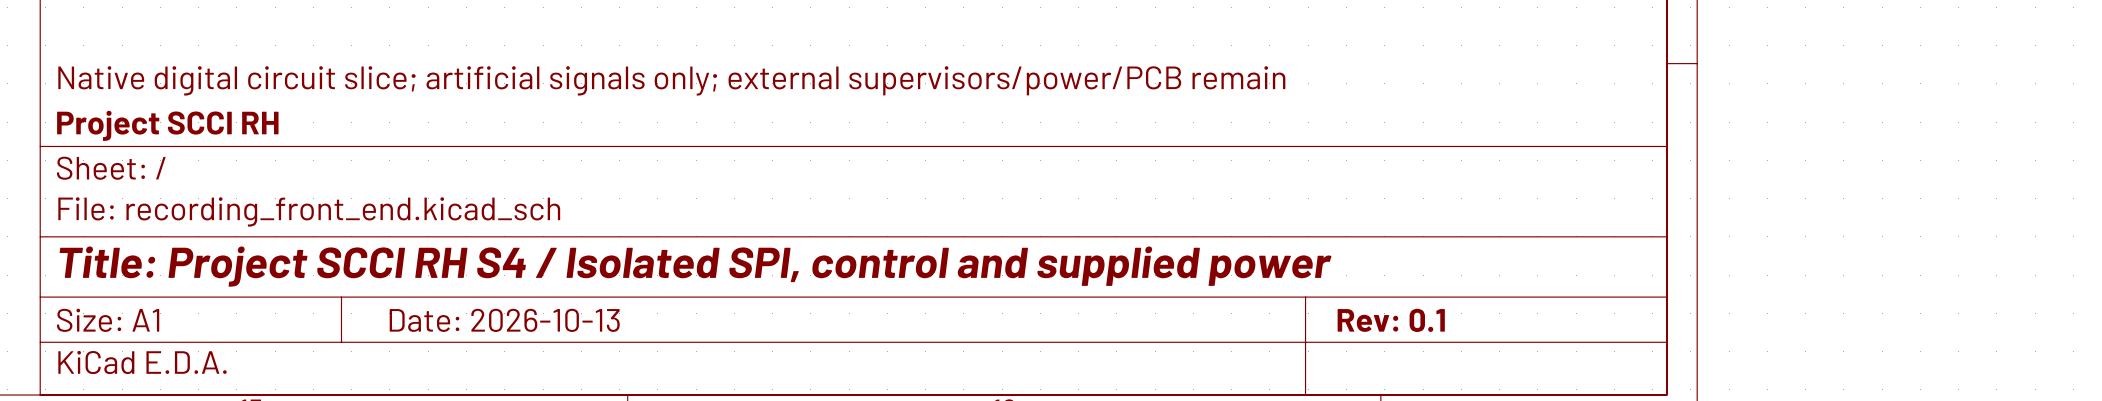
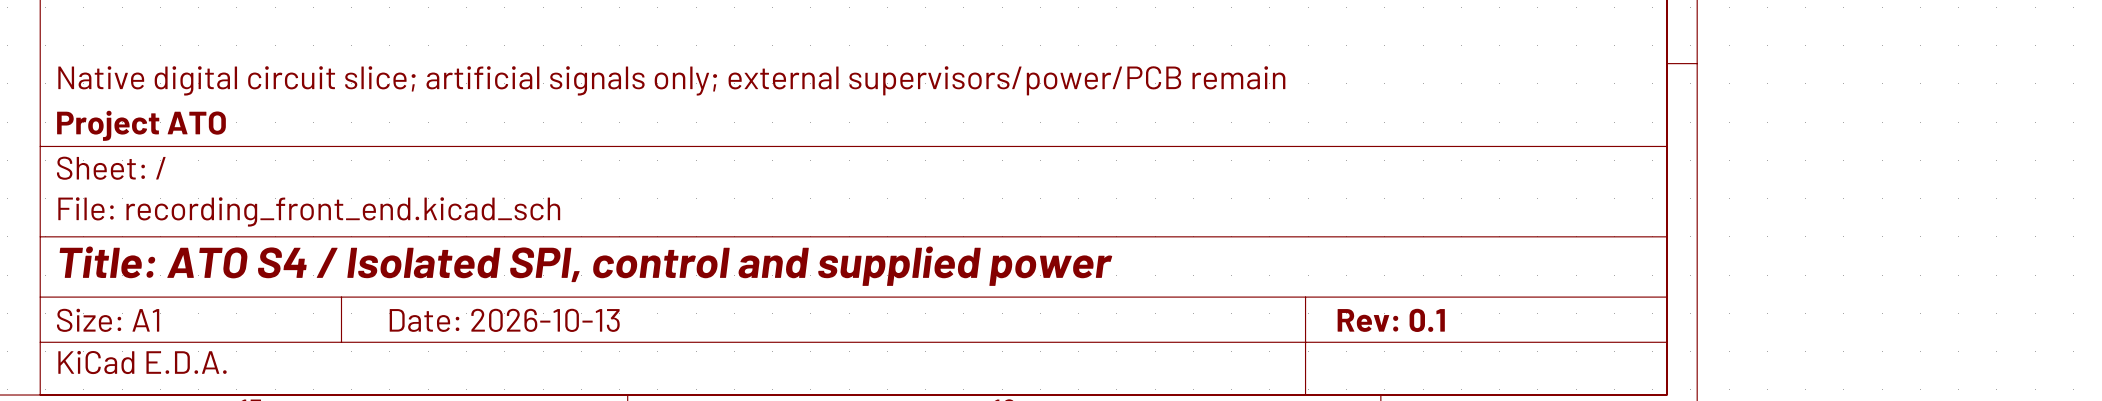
title block: Project SCCI RH (167, 125) -> Project ATO (141, 125)
title block: Title: Project SCCI RH S4 / Isolated SPI, control and supplied power (695, 266) -> Title: ATO S4 / Isolated SPI, control and supplied power (585, 266)

